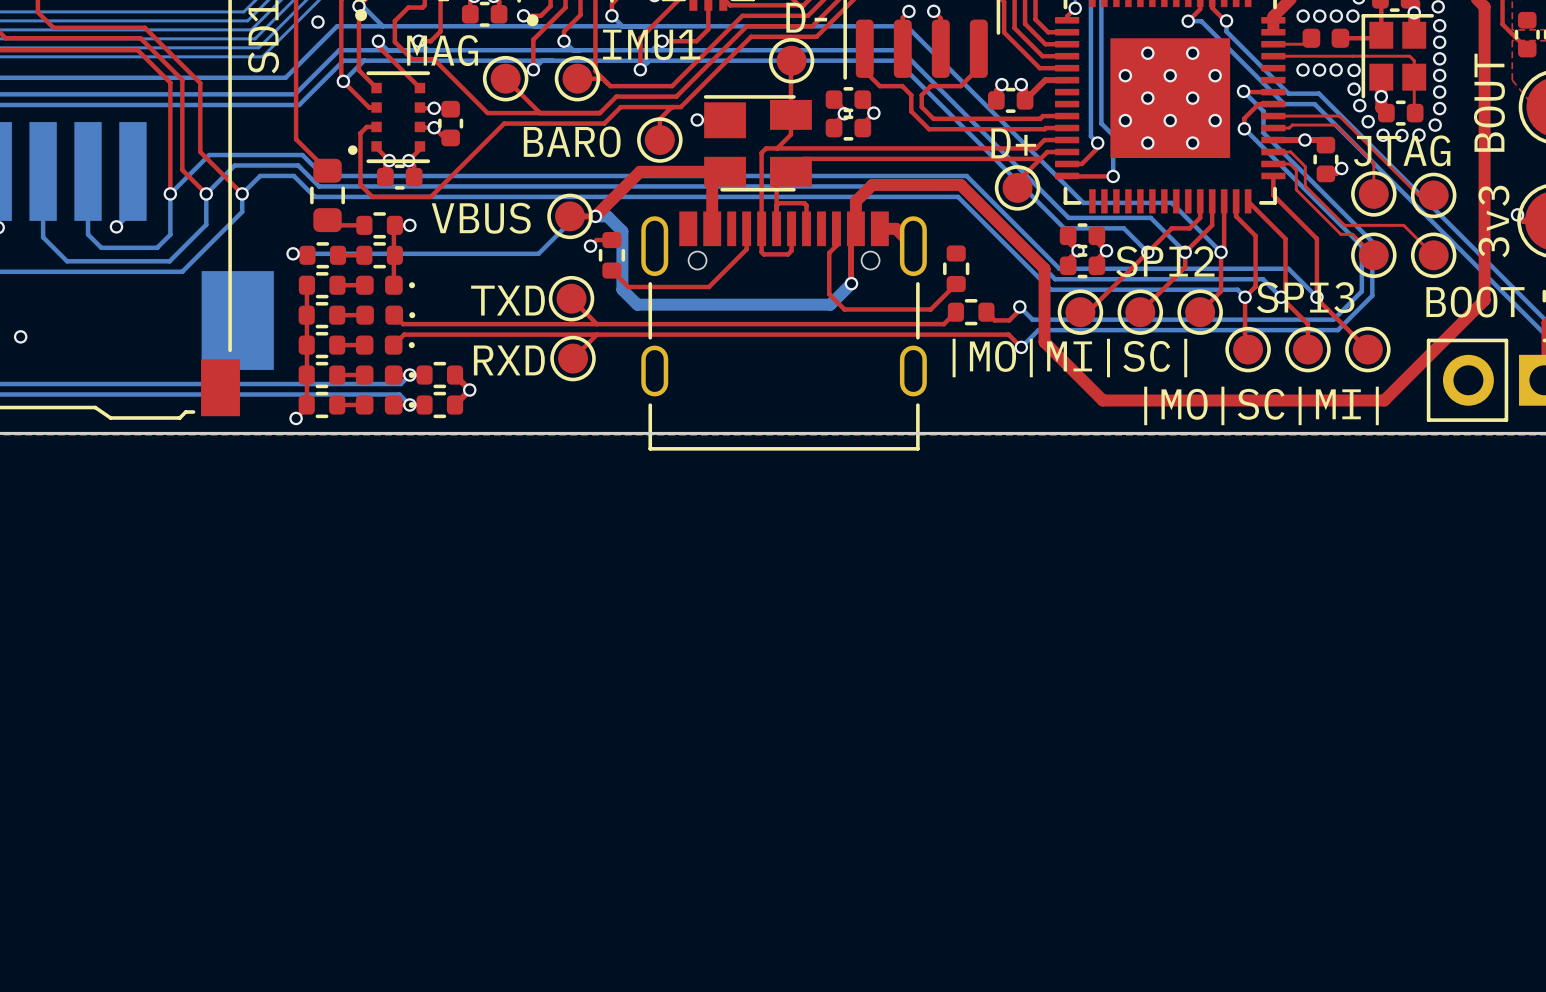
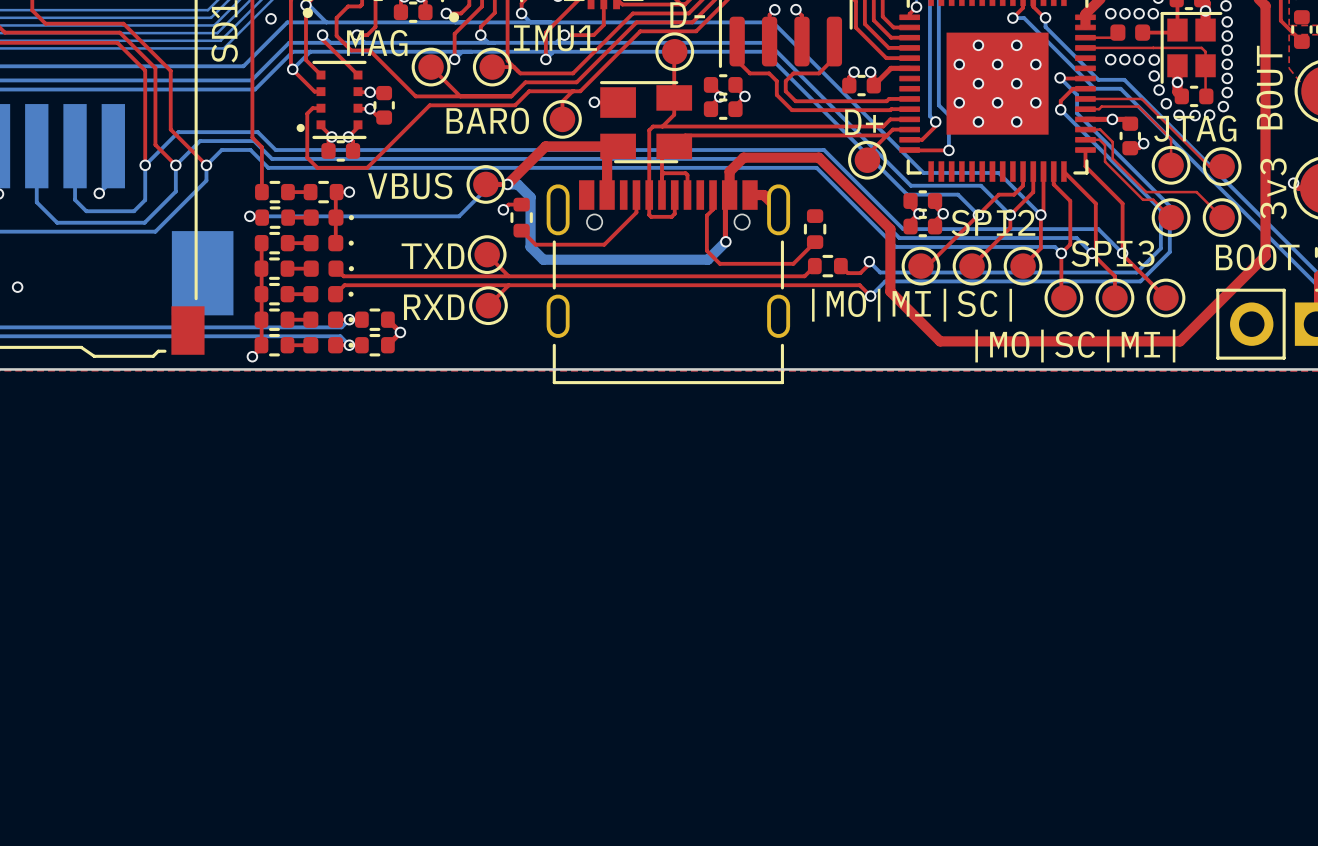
top track: (296, 139) (327, 170) -> (252, 118) (252, 137) (261, 147) (261, 192)
part: (327, 195) -> none
part: none -> (274, 192)
part footprint: [356, 242, 403, 269] -> [303, 209, 354, 226]

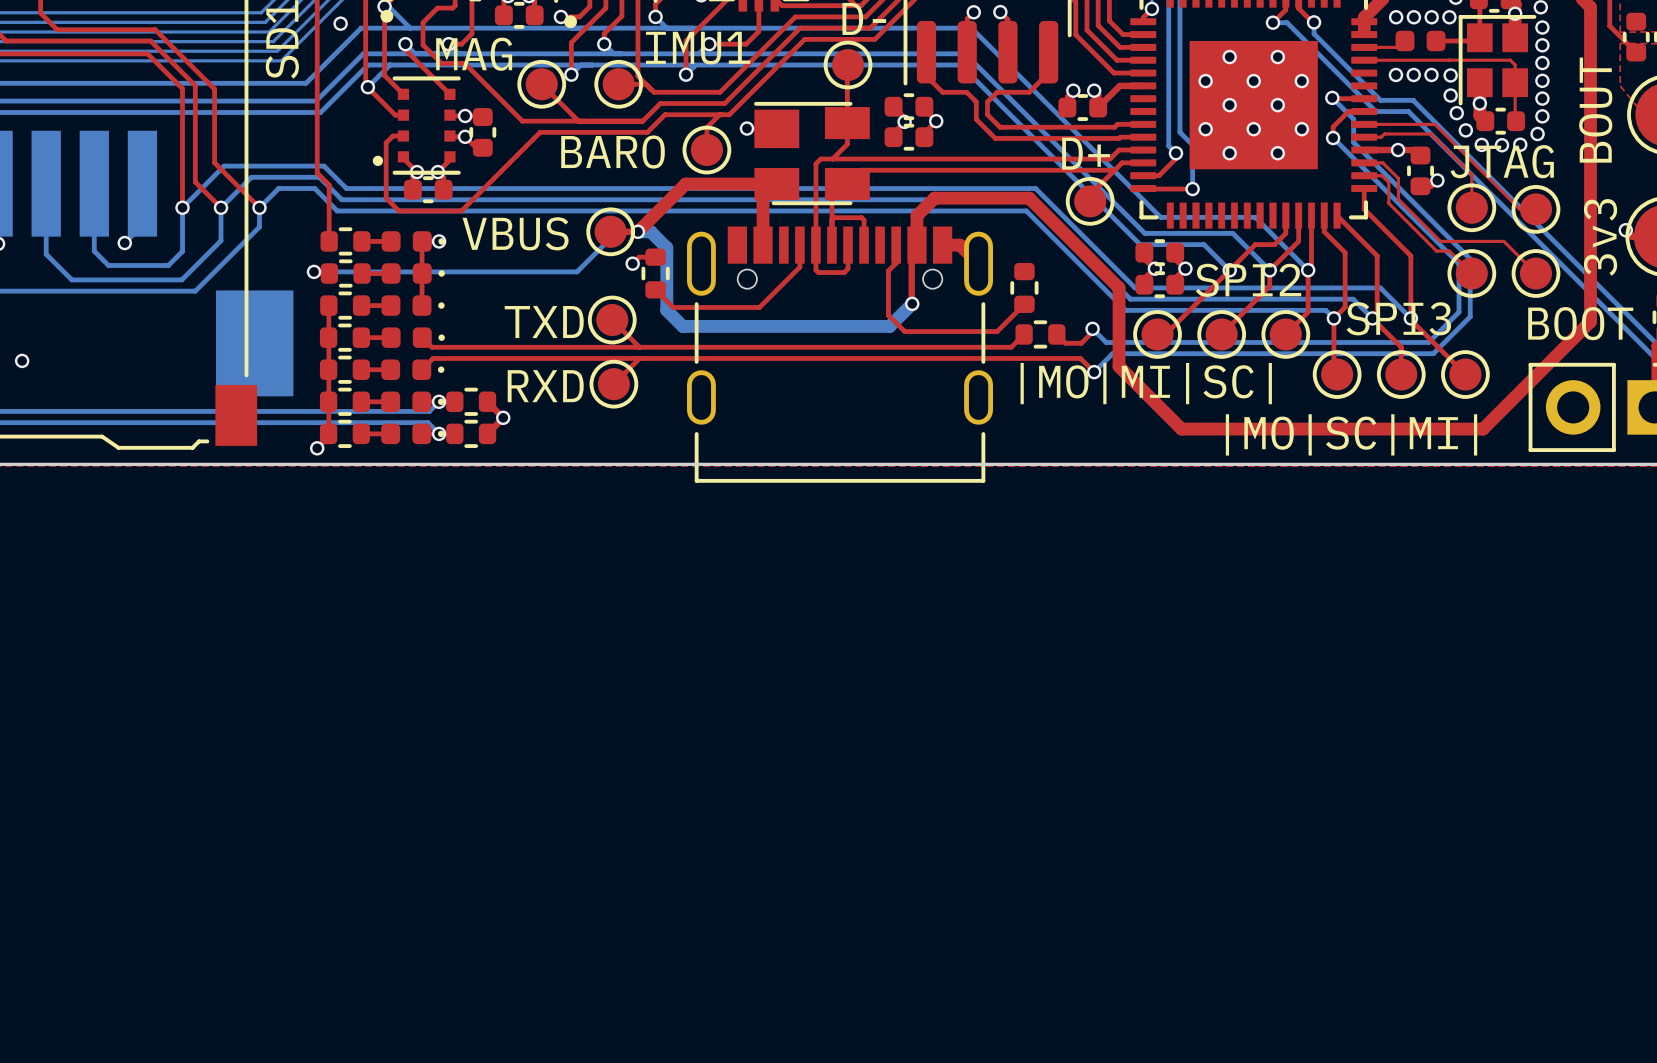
part footprint: [303, 180, 344, 204] -> [381, 231, 445, 252]

